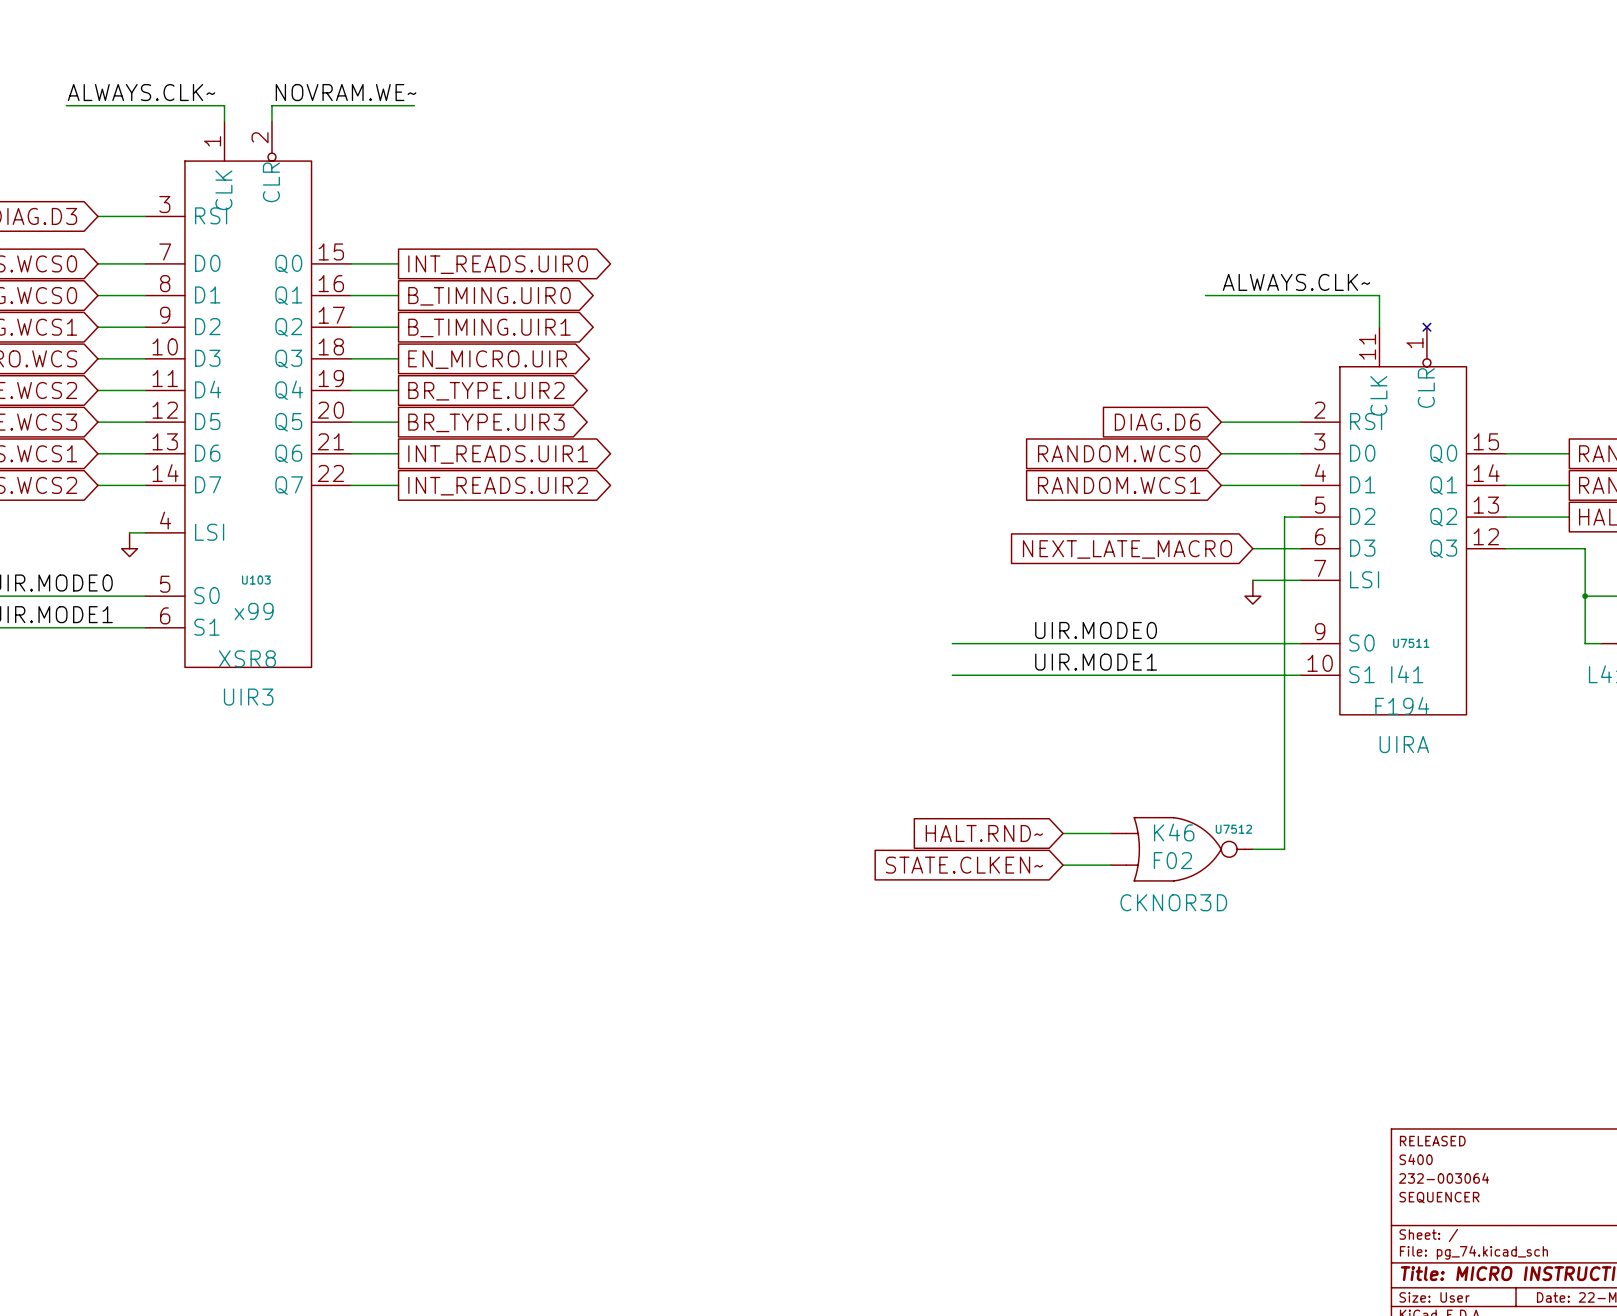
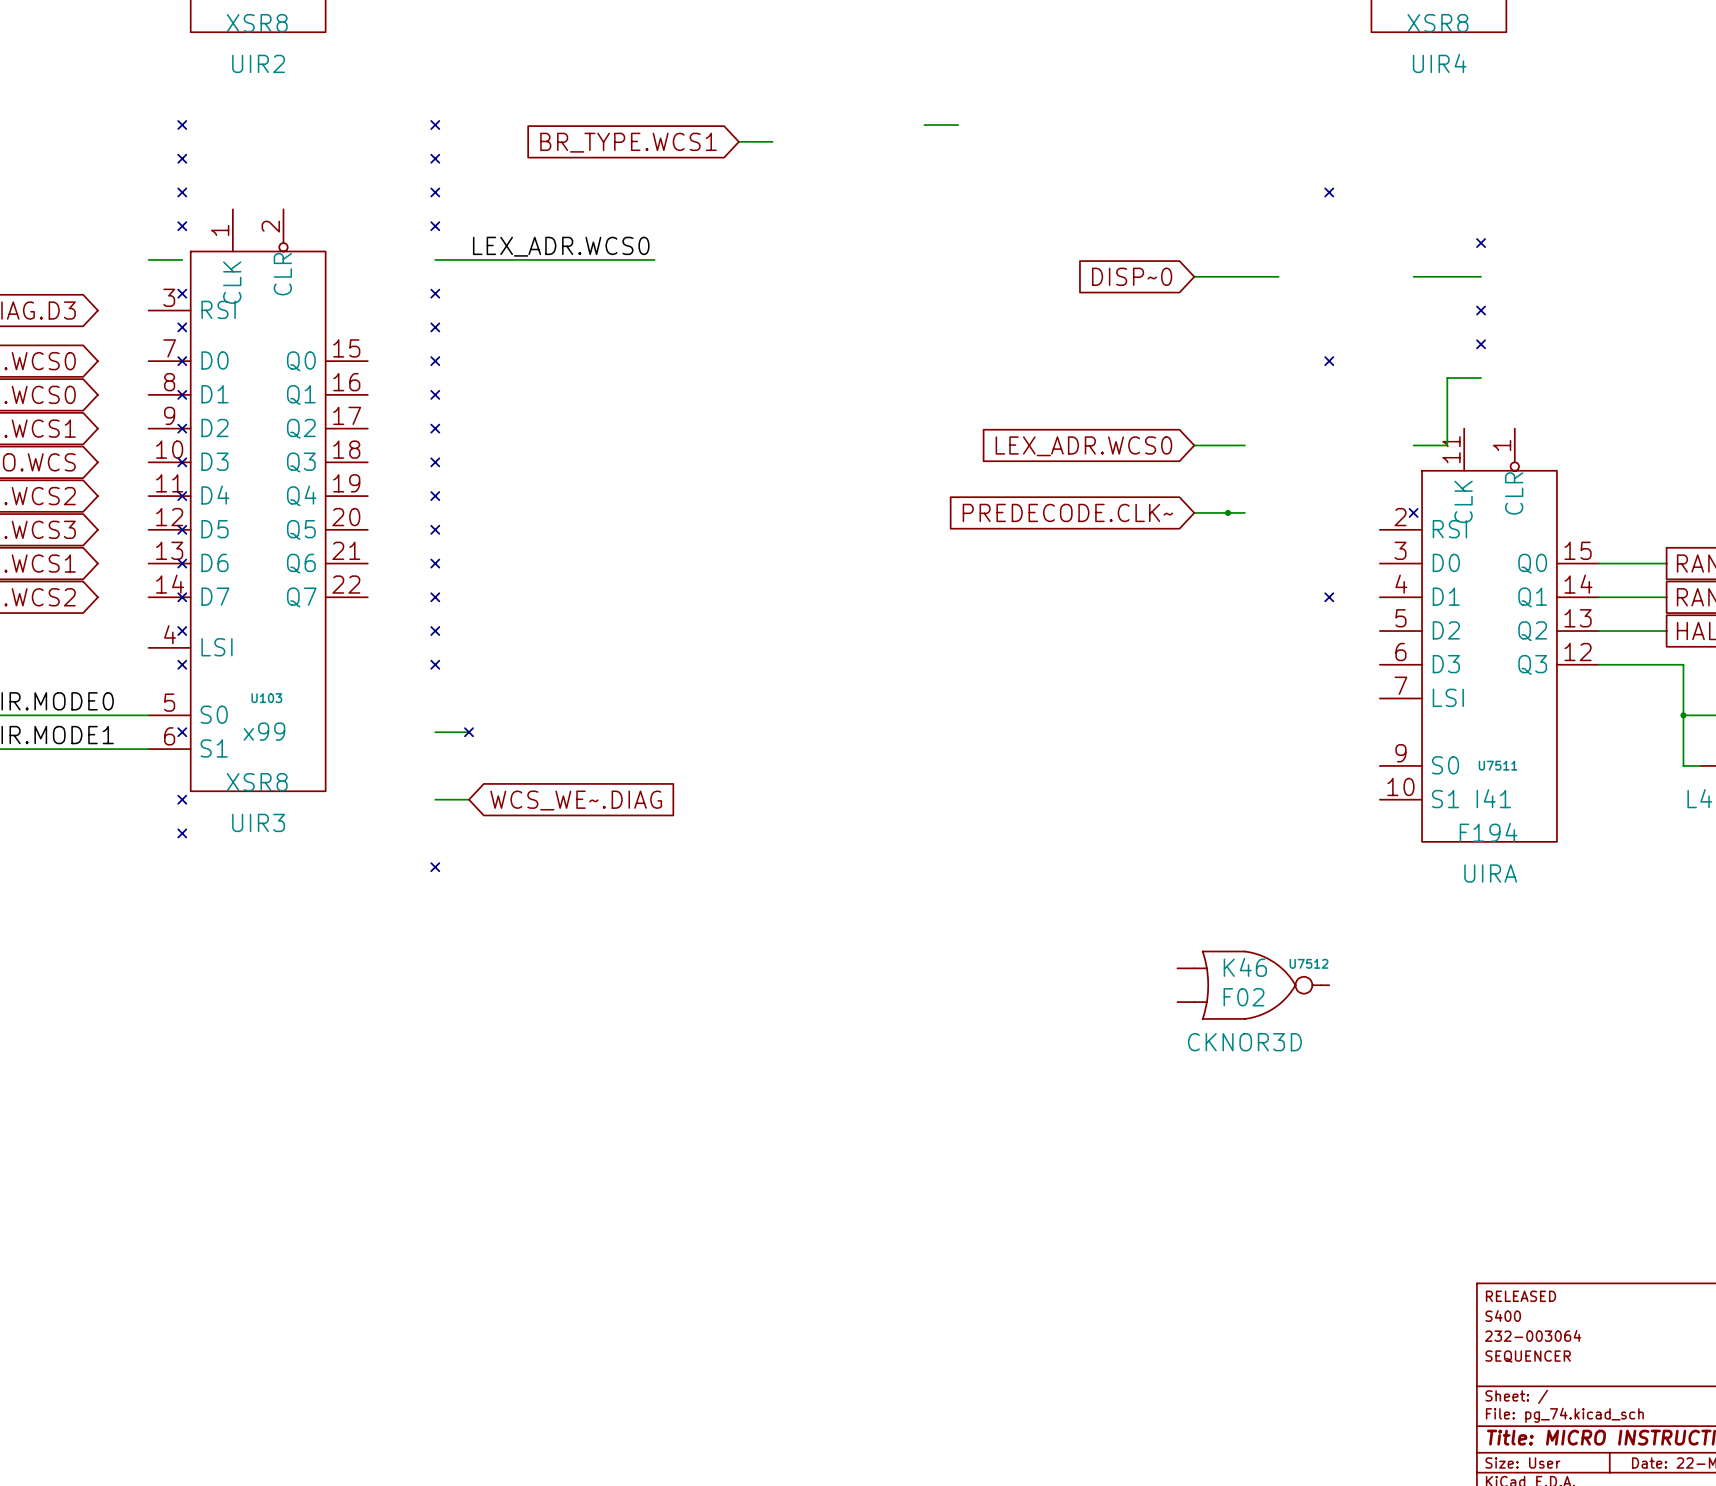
no-connect mark: none -> (182, 125)
no-connect mark: none -> (435, 125)
wire: none -> (924, 125) (958, 125)
global label: none -> BR_TYPE.WCS1 (628, 142)
wire: none -> (738, 141) (772, 141)
no-connect mark: none -> (182, 158)
no-connect mark: none -> (435, 158)
label: ALWAYS.CLK~ (141, 92) -> none
label: NOVRAM.WE~ (346, 92) -> none
wire: (66, 105) (224, 105) (224, 121) -> none
no-connect mark: none -> (182, 192)
wire: (414, 105) (271, 105) (271, 121) -> none
no-connect mark: none -> (435, 192)
no-connect mark: none -> (1329, 192)
no-connect mark: none -> (182, 226)
no-connect mark: none -> (435, 226)
no-connect mark: none -> (1481, 243)
label: none -> LEX_ADR.WCS0 (561, 246)
wire: none -> (148, 259) (182, 259)
wire: none -> (435, 259) (654, 259)
global label: none -> DISP~0 (1132, 276)
wire: none -> (1194, 276) (1278, 276)
wire: none -> (1413, 276) (1481, 276)
no-connect mark: none -> (182, 293)
no-connect mark: none -> (435, 293)
wire: (97, 216) (145, 216) -> none
no-connect mark: none -> (1481, 310)
no-connect mark: none -> (182, 327)
no-connect mark: none -> (435, 327)
no-connect mark: none -> (1481, 344)
wire: (97, 263) (145, 263) -> none
no-connect mark: none -> (182, 361)
wire: (351, 263) (398, 263) -> none
no-connect mark: none -> (435, 361)
no-connect mark: none -> (1329, 361)
global label: INT_READS.UIR0 (498, 264) -> none
wire: none -> (1481, 378) (1447, 378) (1447, 445) (1413, 445)
label: ALWAYS.CLK~ (1296, 282) -> none
wire: (97, 295) (145, 295) -> none
no-connect mark: none -> (182, 394)
wire: (351, 295) (398, 295) -> none
no-connect mark: none -> (435, 394)
wire: (1205, 295) (1379, 295) (1379, 327) -> none
global label: B_TIMING.UIR0 (489, 296) -> none
wire: (97, 327) (145, 327) -> none
no-connect mark: none -> (182, 428)
wire: (351, 327) (398, 327) -> none
no-connect mark: none -> (435, 428)
global label: B_TIMING.UIR1 (489, 327) -> none
no-connect mark: (1426, 327) -> none
global label: none -> LEX_ADR.WCS0 (1083, 446)
wire: none -> (1194, 445) (1244, 445)
wire: (97, 358) (145, 358) -> none
no-connect mark: none -> (182, 462)
wire: (351, 358) (398, 358) -> none
no-connect mark: none -> (435, 462)
global label: EN_MICRO.UIR (487, 359) -> none
wire: (97, 390) (145, 390) -> none
no-connect mark: none -> (182, 496)
wire: (351, 390) (398, 390) -> none
no-connect mark: none -> (435, 496)
global label: BR_TYPE.UIR2 (486, 391) -> none
global label: none -> PREDECODE.CLK~ (1067, 512)
wire: none -> (1194, 512) (1244, 512)
junction: none -> (1228, 512)
no-connect mark: none -> (1413, 512)
wire: (97, 422) (145, 422) -> none
no-connect mark: none -> (182, 529)
wire: (351, 422) (398, 422) -> none
no-connect mark: none -> (435, 529)
global label: BR_TYPE.UIR3 (486, 422) -> none
global label: DIAG.D6 (1157, 422) -> none
wire: (1221, 422) (1300, 422) -> none
wire: (97, 453) (145, 453) -> none
no-connect mark: none -> (182, 563)
wire: (351, 453) (398, 453) -> none
no-connect mark: none -> (435, 563)
global label: RANDOM.WCS0 (1119, 453) -> none
wire: (1221, 453) (1300, 453) -> none
global label: INT_READS.UIR1 (498, 454) -> none
wire: (97, 485) (145, 485) -> none
no-connect mark: none -> (182, 597)
wire: (351, 485) (398, 485) -> none
no-connect mark: none -> (435, 597)
global label: RANDOM.WCS1 (1119, 485) -> none
wire: (1221, 485) (1300, 485) -> none
no-connect mark: none -> (1329, 597)
global label: INT_READS.UIR2 (498, 486) -> none
no-connect mark: none -> (182, 631)
no-connect mark: none -> (435, 631)
wire: (1300, 517) (1284, 517) (1284, 849) (1252, 849) -> none
wire: (129, 532) (145, 532) -> none
power symbol: (129, 544) -> none
no-connect mark: none -> (182, 664)
no-connect mark: none -> (435, 664)
wire: (1252, 548) (1300, 548) -> none
global label: NEXT_LATE_MACRO (1127, 549) -> none
wire: (1252, 580) (1300, 580) -> none
power symbol: (1252, 592) -> none
no-connect mark: none -> (182, 732)
wire: none -> (435, 732) (469, 732)
no-connect mark: none -> (469, 732)
label: UIR.MODE0 (1096, 630) -> none
wire: (952, 643) (1300, 643) -> none
label: UIR.MODE1 (1096, 662) -> none
no-connect mark: none -> (182, 799)
wire: none -> (435, 799) (469, 799)
wire: (952, 675) (1300, 675) -> none
global label: none -> WCS_WE~.DIAG (576, 800)
no-connect mark: none -> (182, 833)
no-connect mark: none -> (435, 867)
global label: HALT.RND~ (984, 833) -> none
wire: (1063, 833) (1110, 833) -> none
global label: STATE.CLKEN~ (964, 865) -> none
wire: (1063, 865) (1110, 865) -> none

